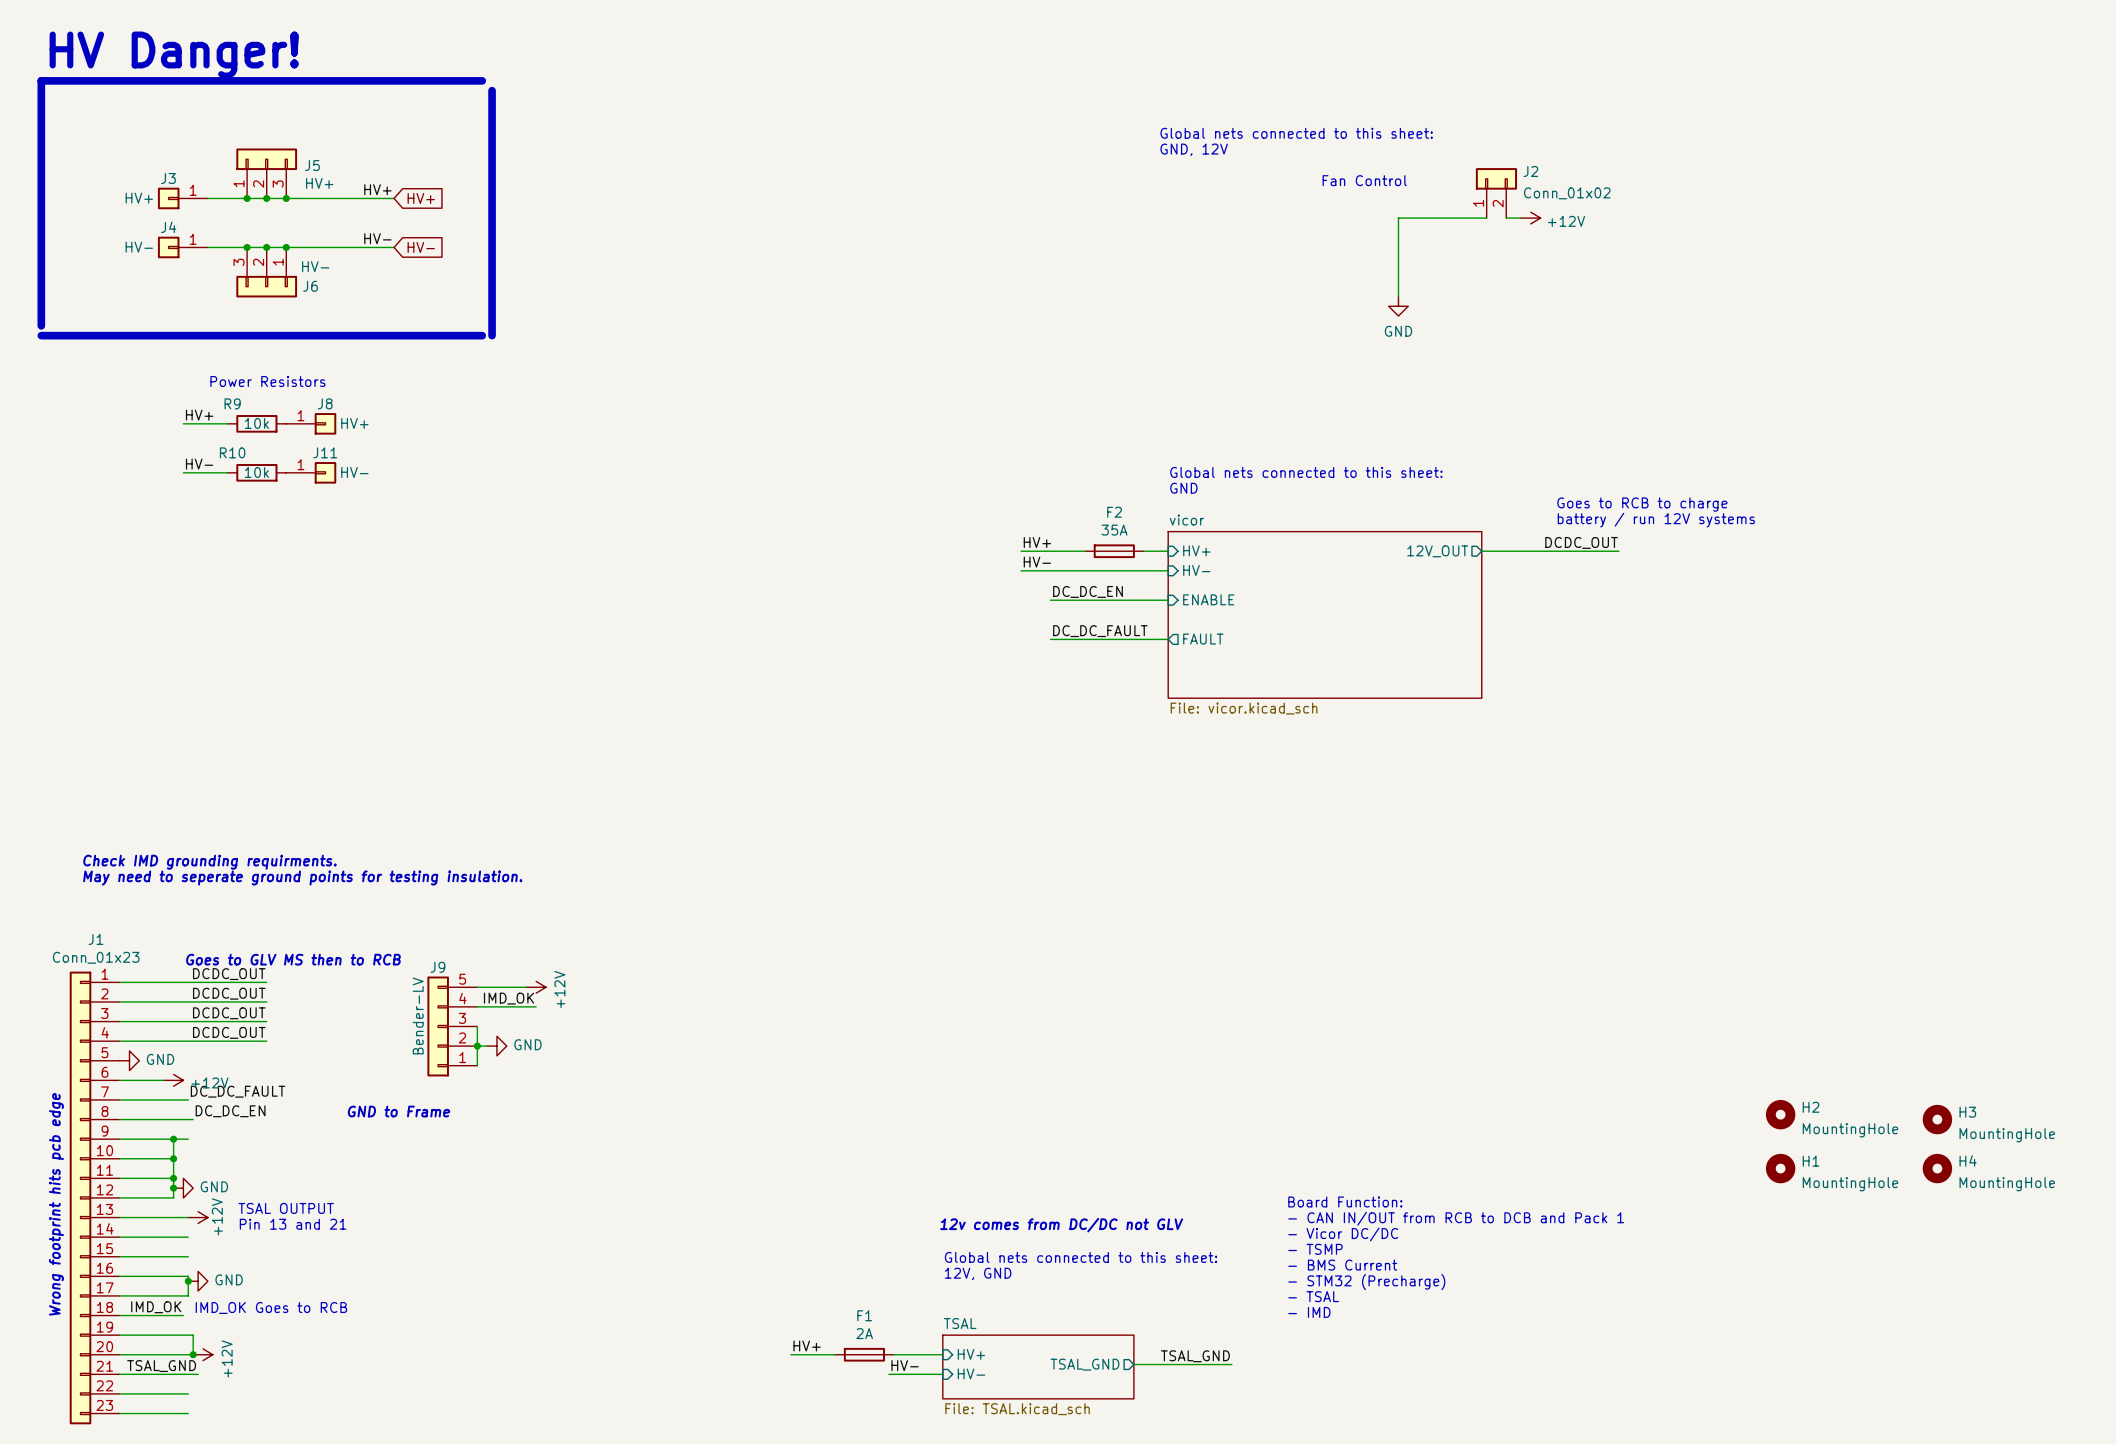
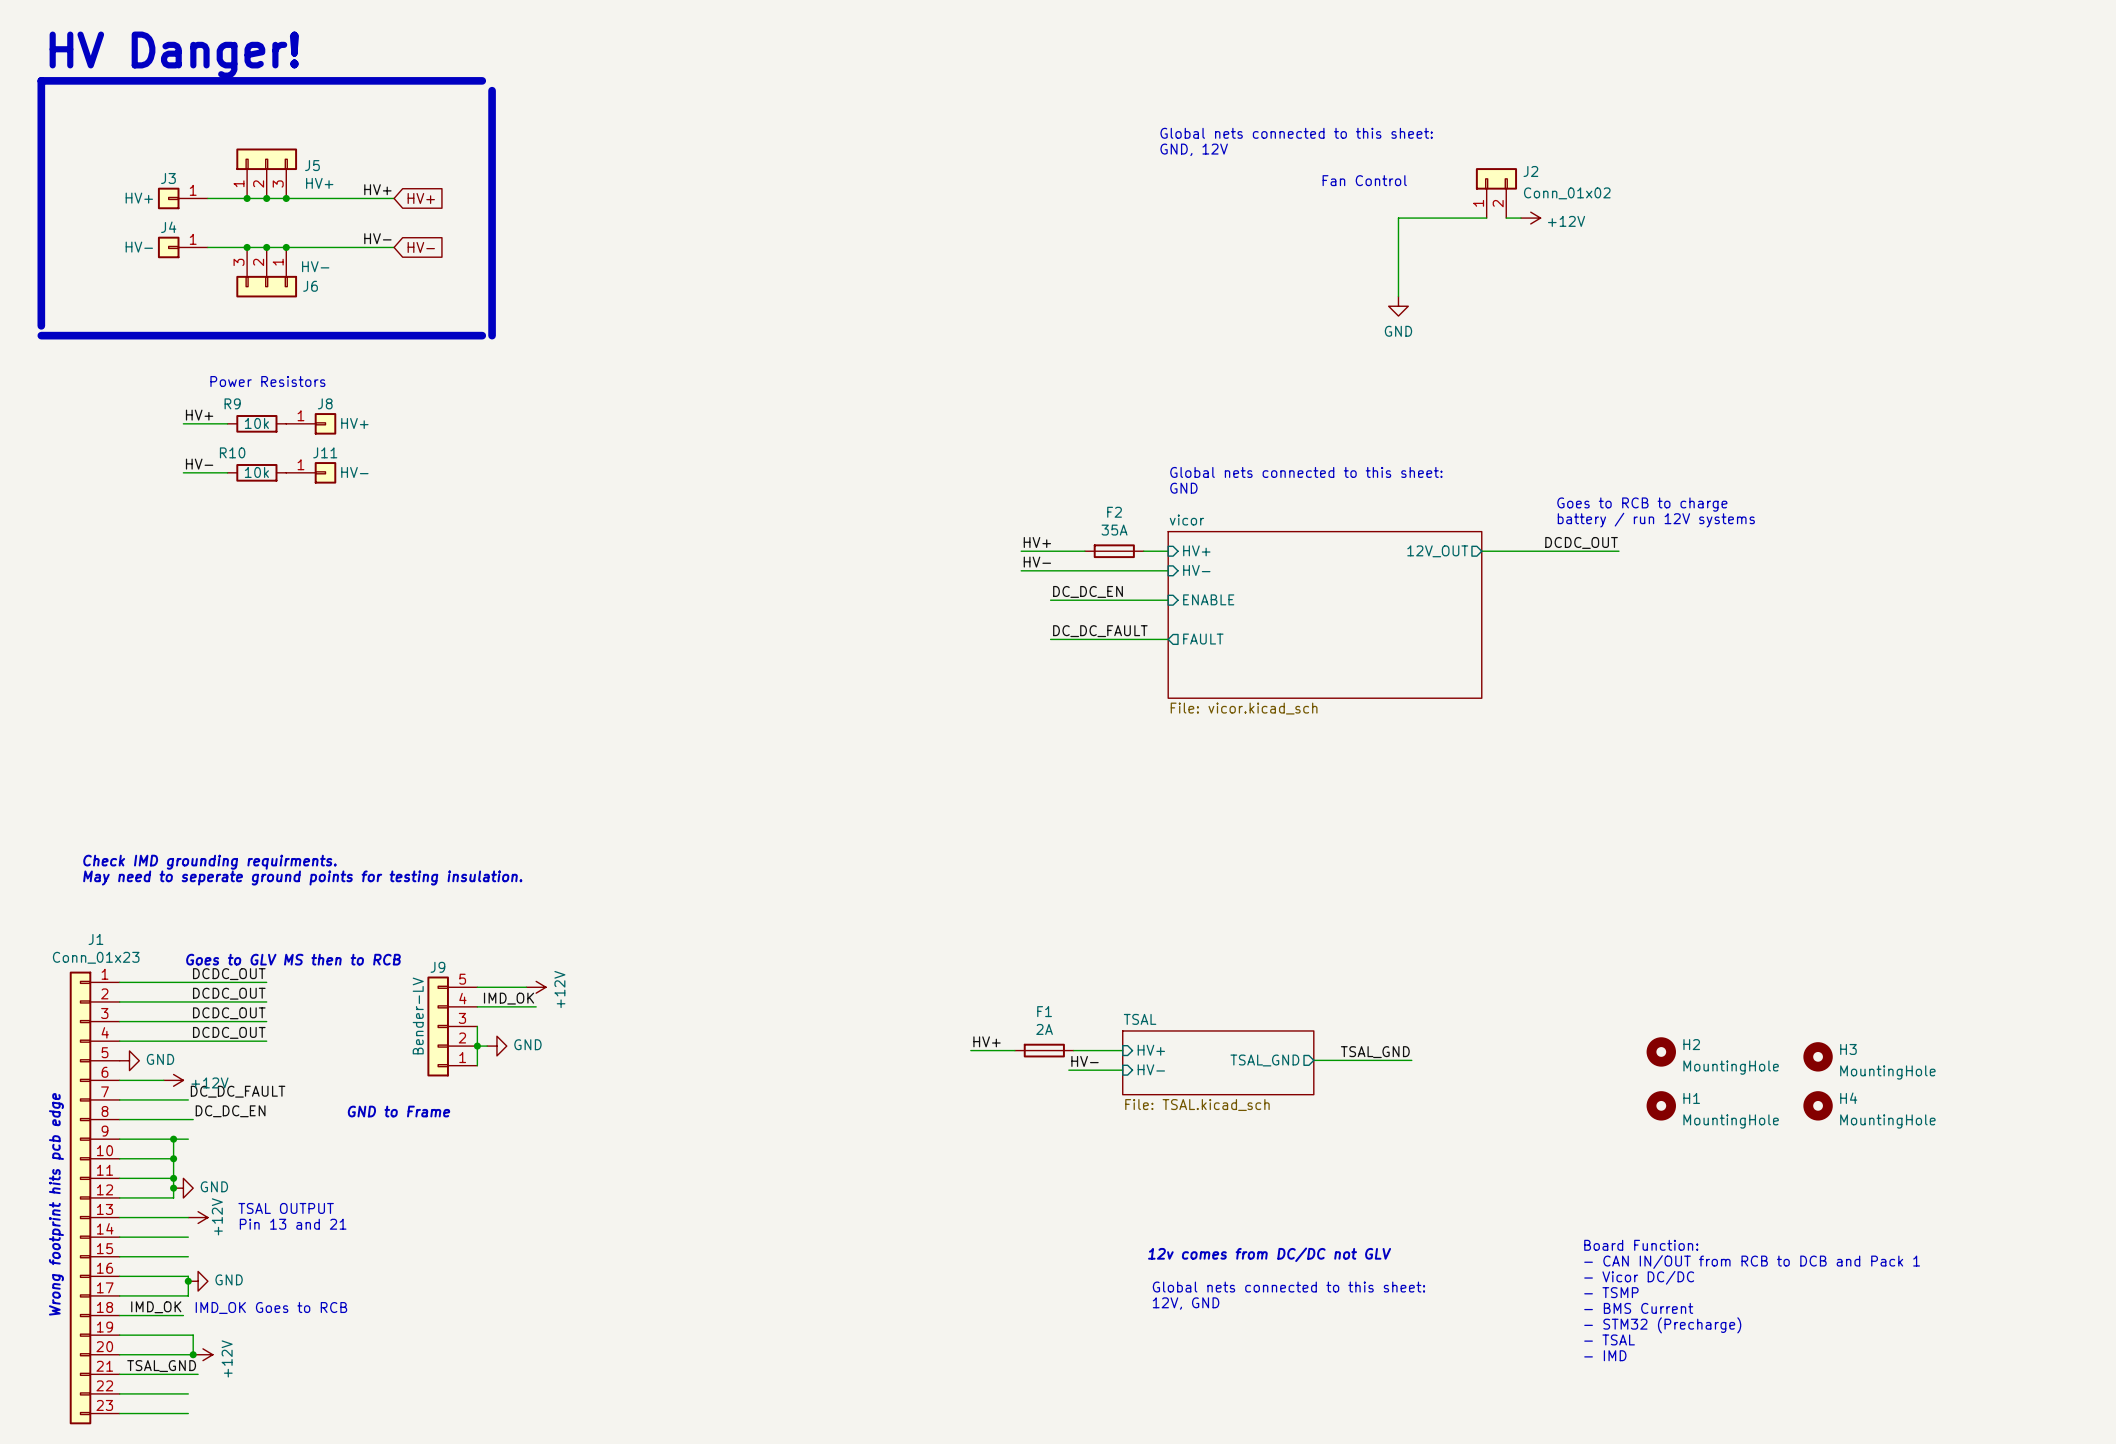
label: none -> HV+ (987, 1041)
wire: none -> (970, 1050) (1014, 1050)
wire: none -> (1073, 1050) (1122, 1050)
sheet pin: none -> HV+ (1151, 1050)
label: none -> TSAL_GND (1375, 1052)
sheet pin: none -> TSAL_GND (1264, 1060)
wire: none -> (1313, 1060) (1411, 1060)
label: none -> HV- (1085, 1061)
sheet TSAL: none -> File: TSAL.kicad_sch (1218, 1062)
sheet pin: none -> HV- (1151, 1069)
wire: none -> (1068, 1070) (1122, 1070)
H2 position: (1780, 1114) -> (1661, 1051)
H3 position: (1937, 1119) -> (1818, 1056)
H1 position: (1780, 1168) -> (1661, 1105)
H4 position: (1937, 1168) -> (1818, 1105)
text: Board Function: (1345, 1201) -> none
text: - CAN IN/OUT from RCB to DCB and Pack 1 (1456, 1218) -> none
text: 12v comes from DC/DC not GLV (1061, 1225) -> none
text: - Vicor DC/DC (1343, 1234) -> none
text: none -> Board Function: (1641, 1245)
text: - TSMP (1315, 1249) -> none
text: none -> 12v comes from DC/DC not GLV (1269, 1254)
text: Global nets connected to this sheet: (1081, 1257) -> none
text: none -> - CAN IN/OUT from RCB to DCB and Pack 1 (1752, 1262)
text: - BMS Current (1342, 1265) -> none
text: 12V, GND (978, 1273) -> none
text: none -> - Vicor DC/DC (1639, 1277)
text: - STM32 (Precharge) (1366, 1282) -> none
text: none -> Global nets connected to this sheet: (1288, 1287)
text: none -> - TSMP (1611, 1292)
text: - TSAL (1313, 1296) -> none
text: none -> 12V, GND (1186, 1303)
text: none -> - BMS Current (1638, 1308)
text: - IMD (1309, 1312) -> none
text: none -> - STM32 (Precharge) (1662, 1325)
text: none -> - TSAL (1609, 1339)
label: HV+ (807, 1346) -> none
wire: (790, 1354) (835, 1354) -> none
F1 position: (864, 1354) -> (1044, 1050)
wire: (893, 1354) (942, 1354) -> none
sheet pin: HV+ (971, 1354) -> none
text: none -> - IMD (1605, 1355)
label: TSAL_GND (1195, 1356) -> none
sheet pin: TSAL_GND (1084, 1364) -> none
wire: (1133, 1364) (1231, 1364) -> none
label: HV- (905, 1365) -> none
sheet TSAL: File: TSAL.kicad_sch (1038, 1366) -> none
sheet pin: HV- (971, 1373) -> none
wire: (888, 1374) (942, 1374) -> none

